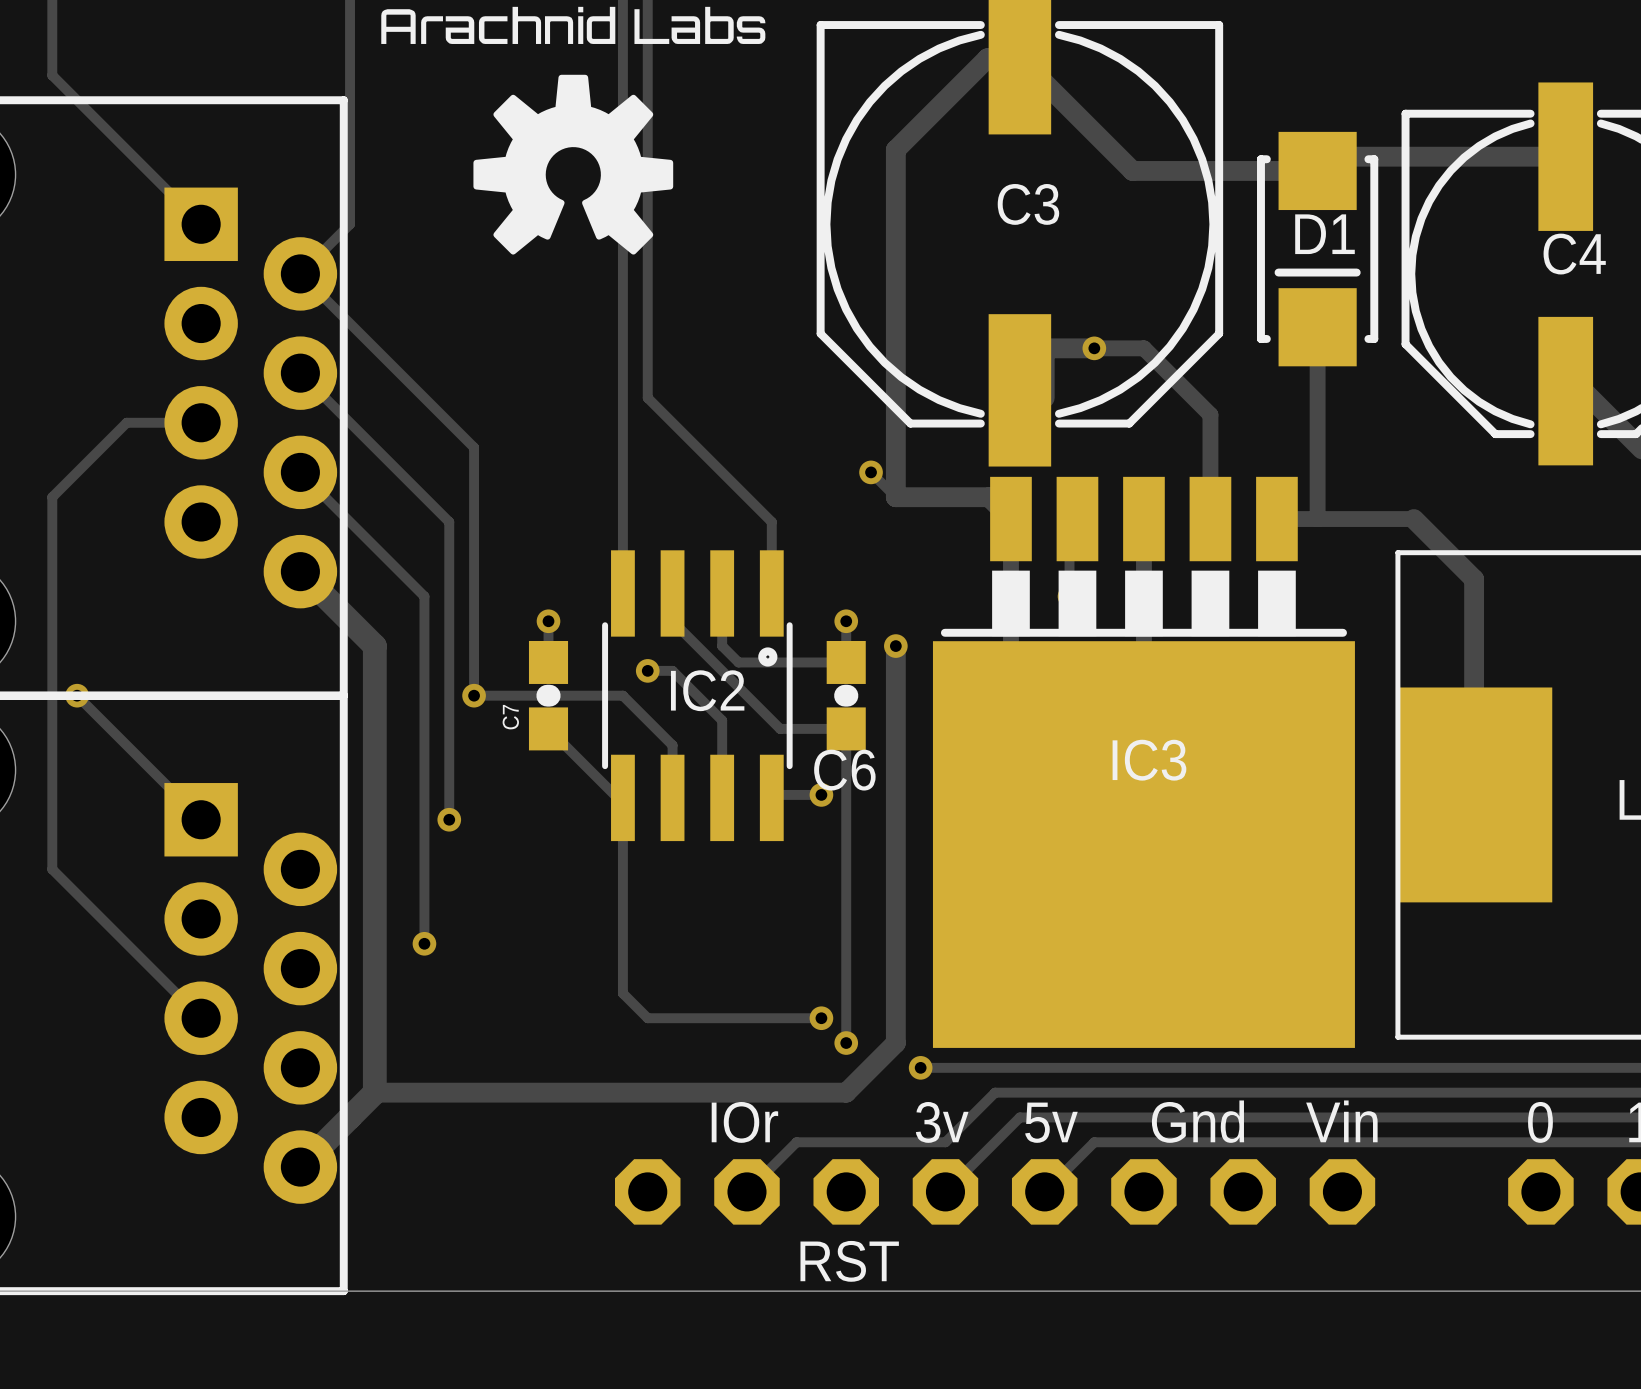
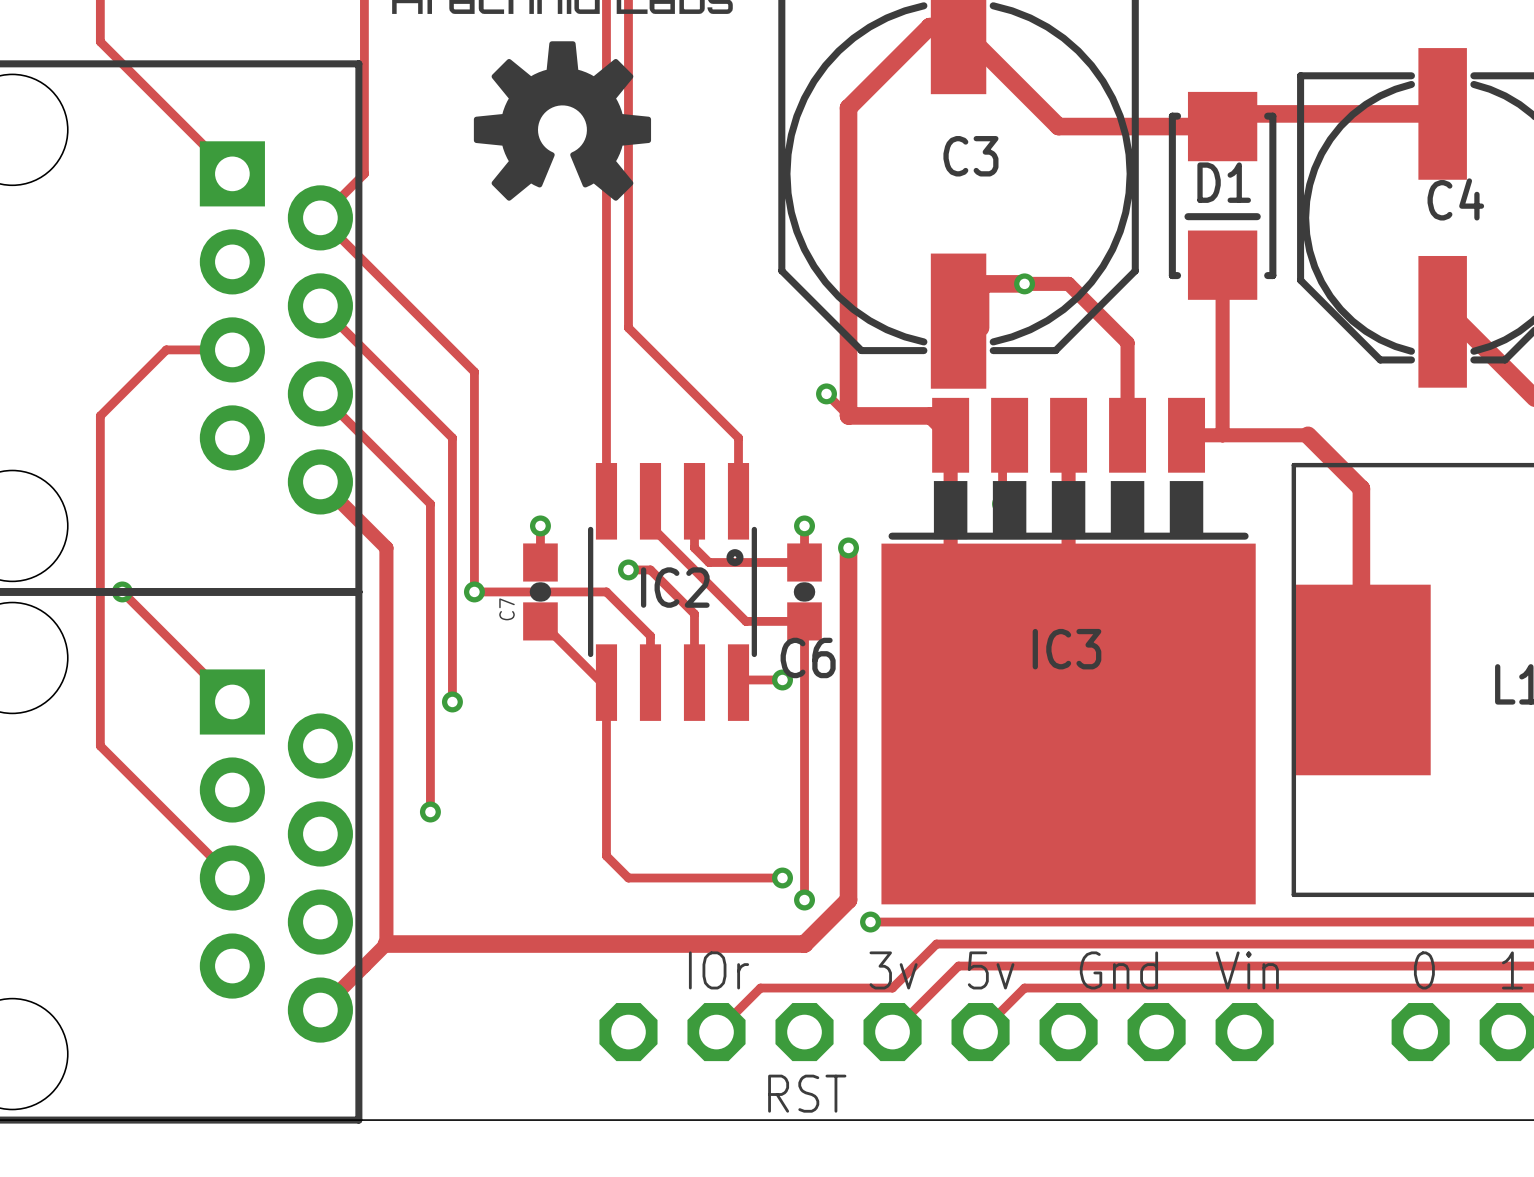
track width: thick (300, 571) (374, 646) (374, 1092) (300, 1167) -> thin (320, 481) (386, 547) (386, 944) (320, 1010)

